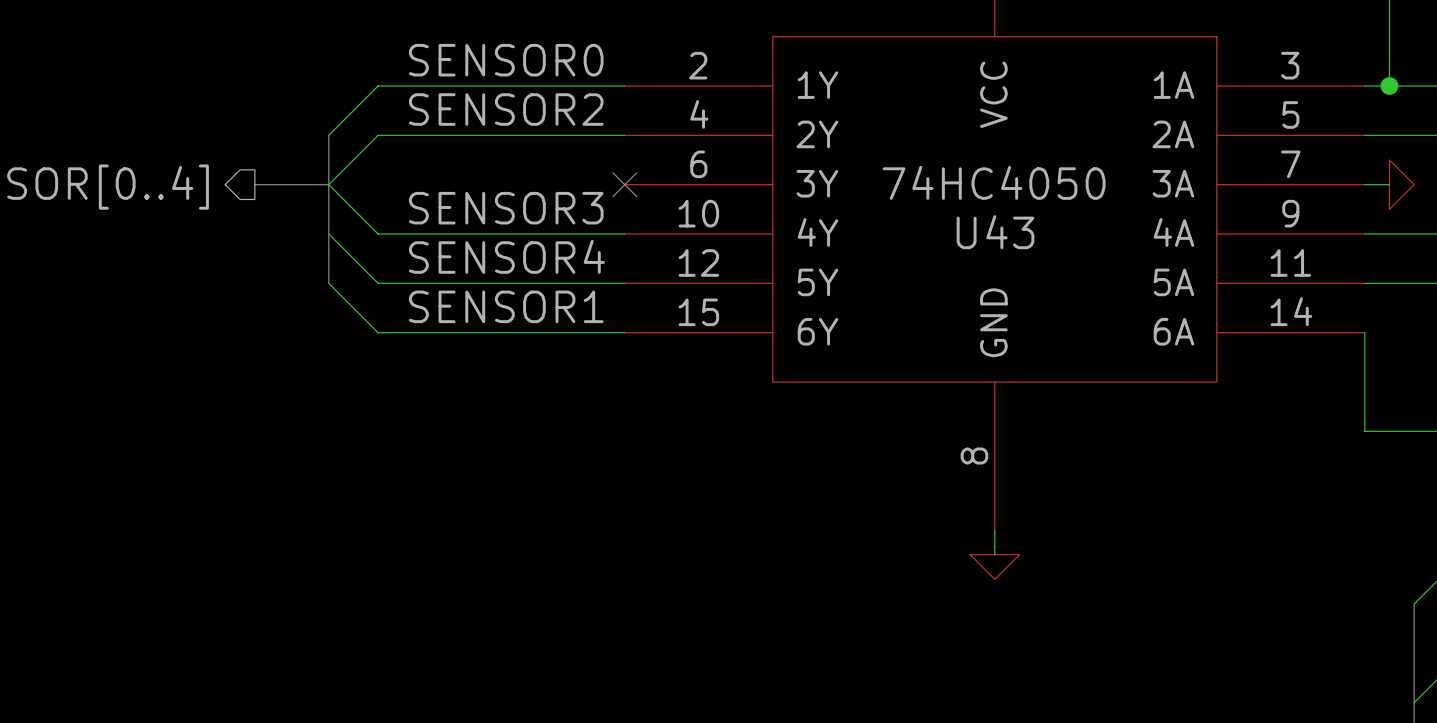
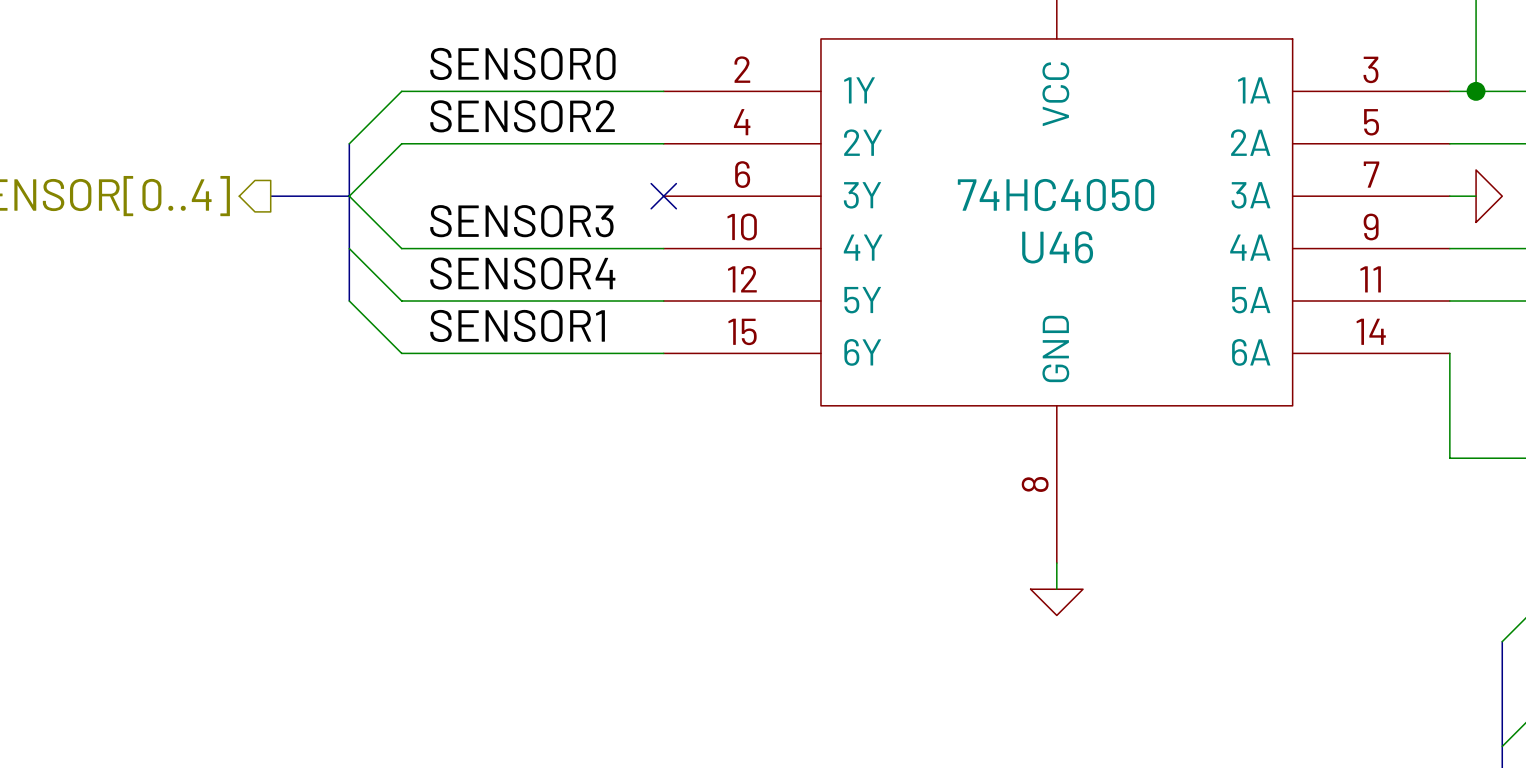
U43 name: U43 (995, 232) -> U46 (1057, 247)

